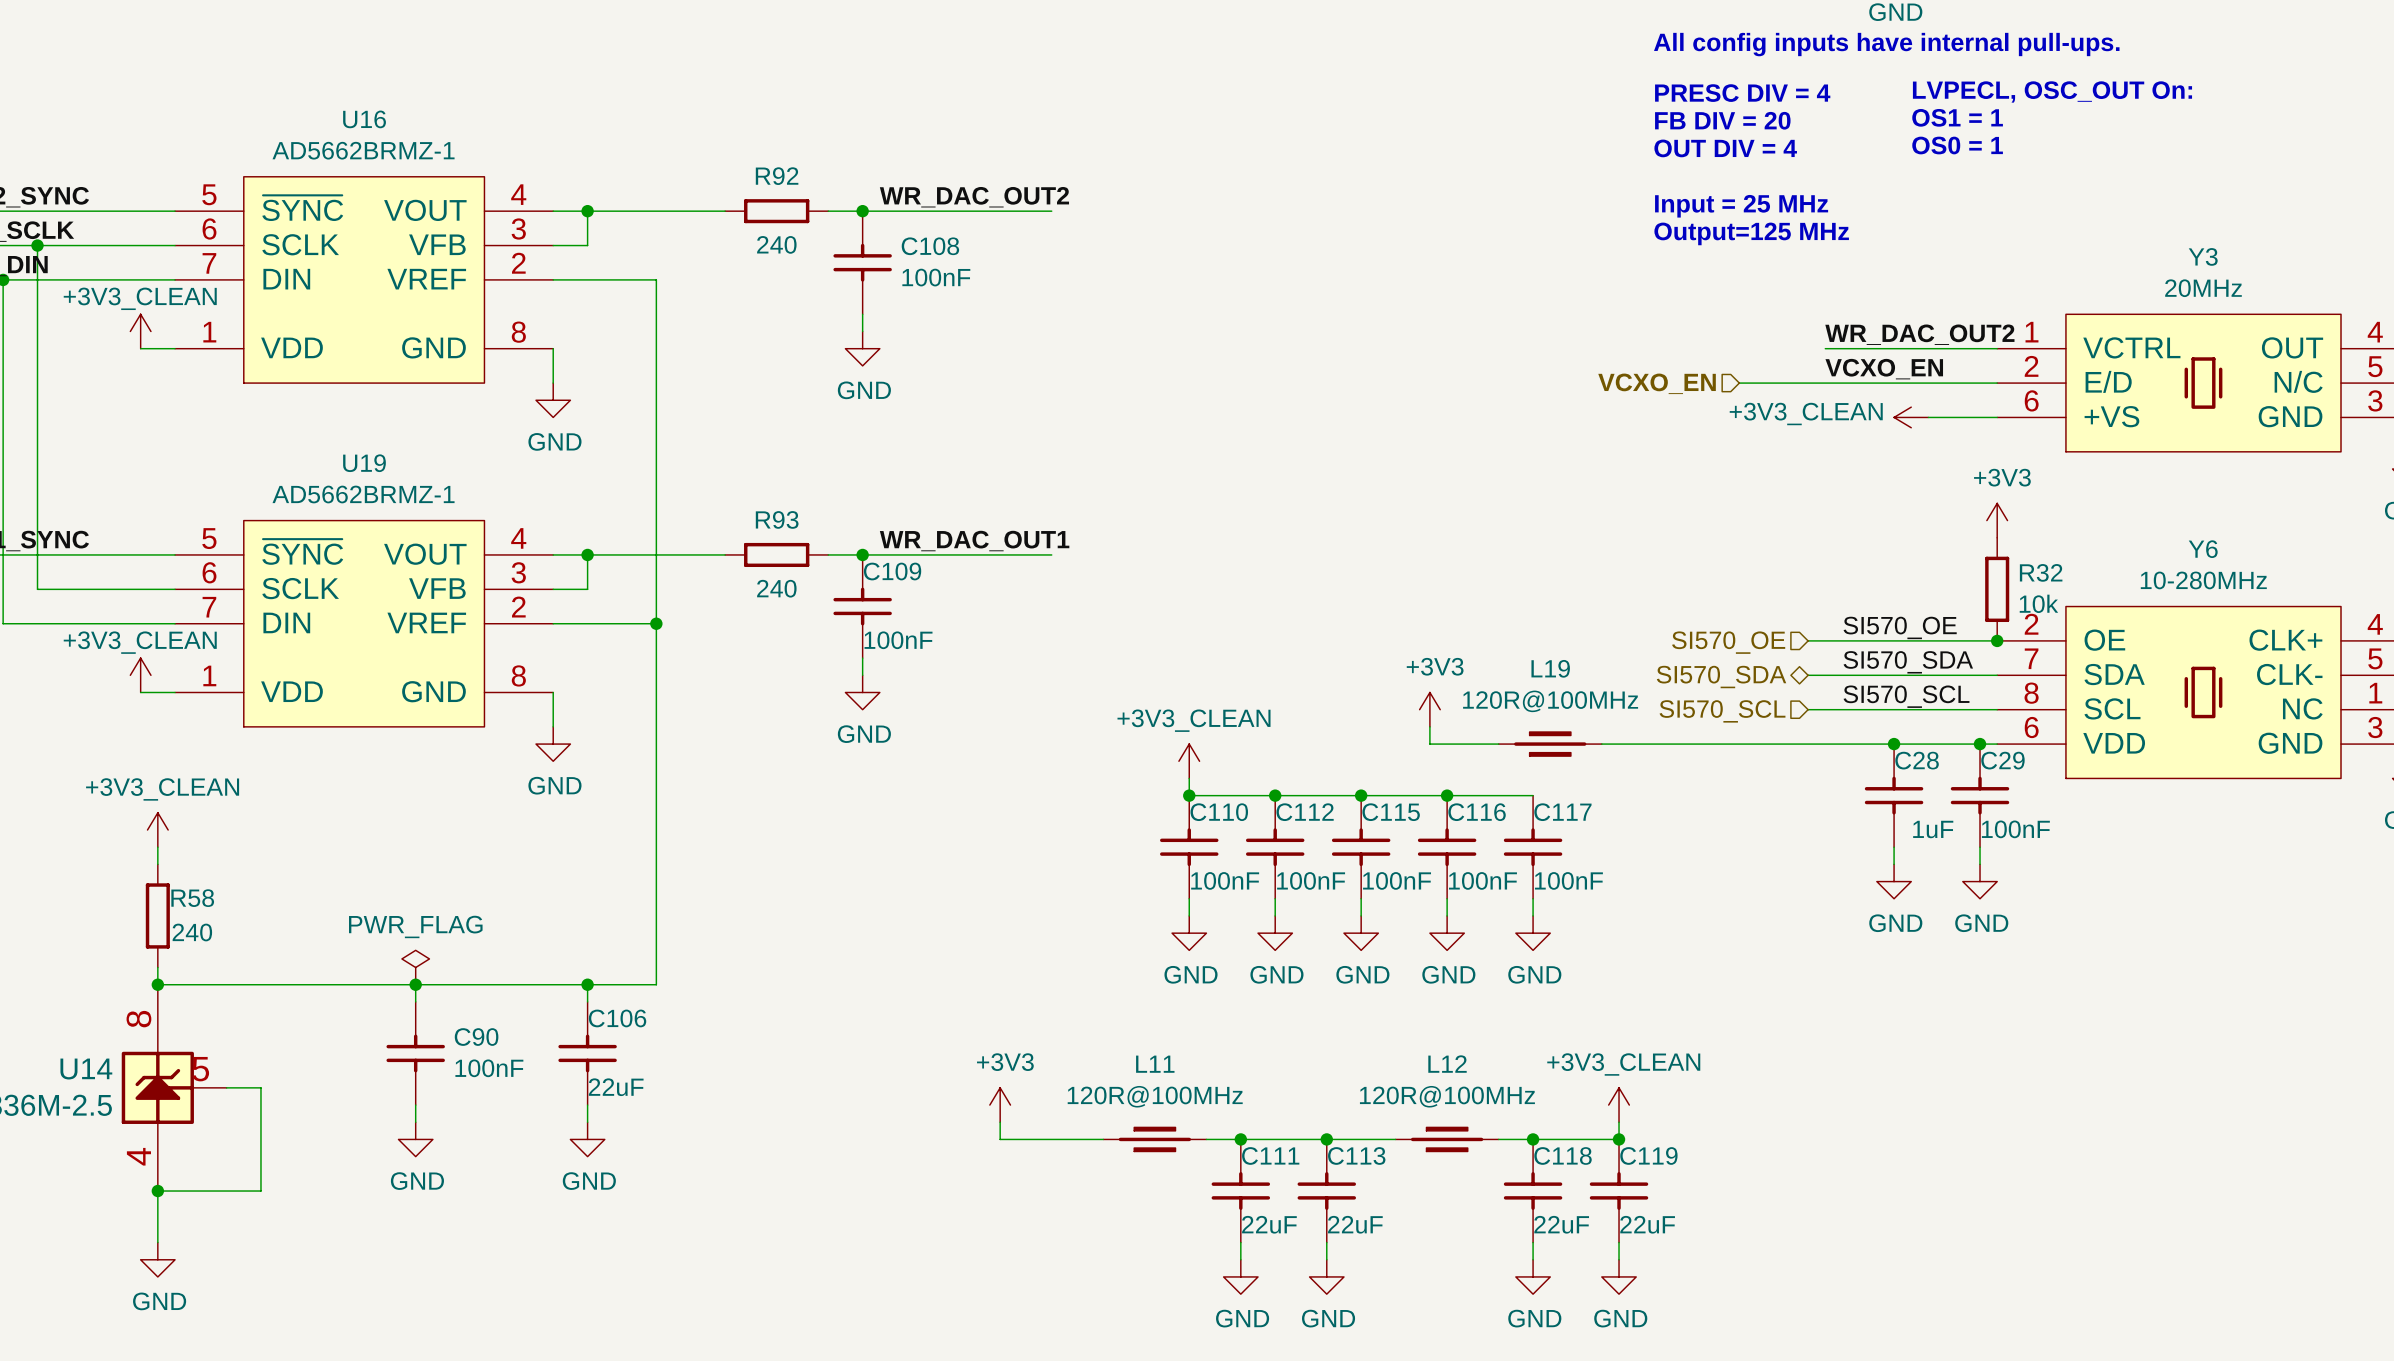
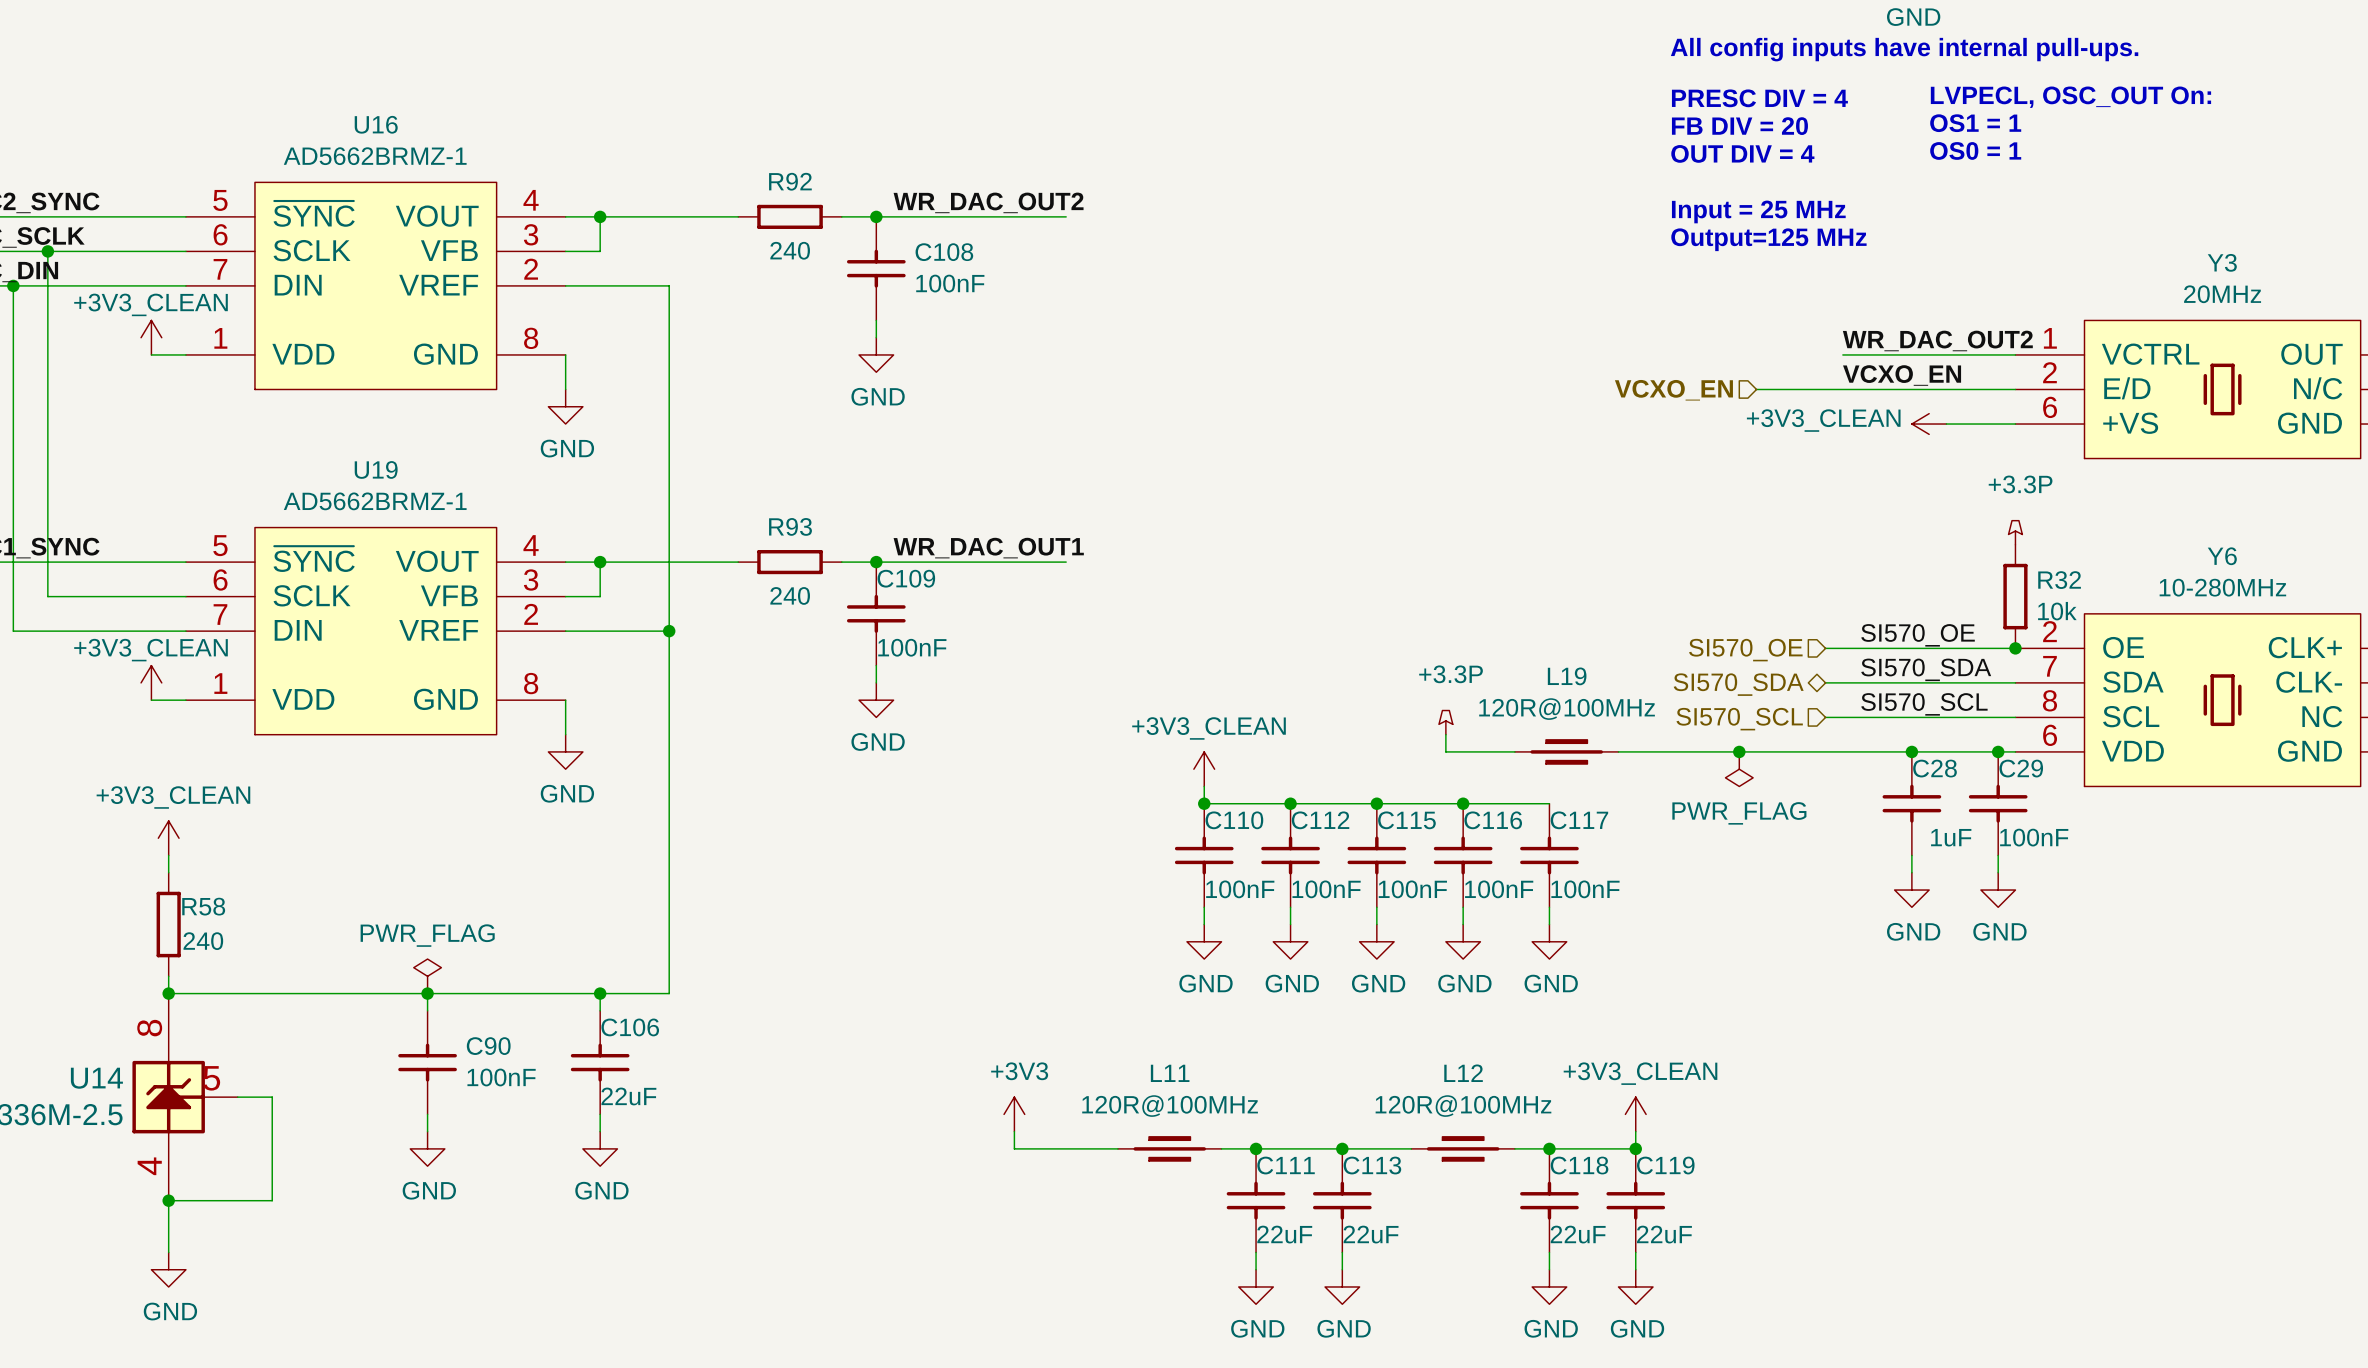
power symbol: +3V3 (1997, 520) -> +3.3P (2015, 532)
power symbol: +3V3 (1429, 709) -> +3.3P (1445, 722)
junction: none -> (1739, 751)
power symbol: none -> PWR_FLAG (1739, 769)

